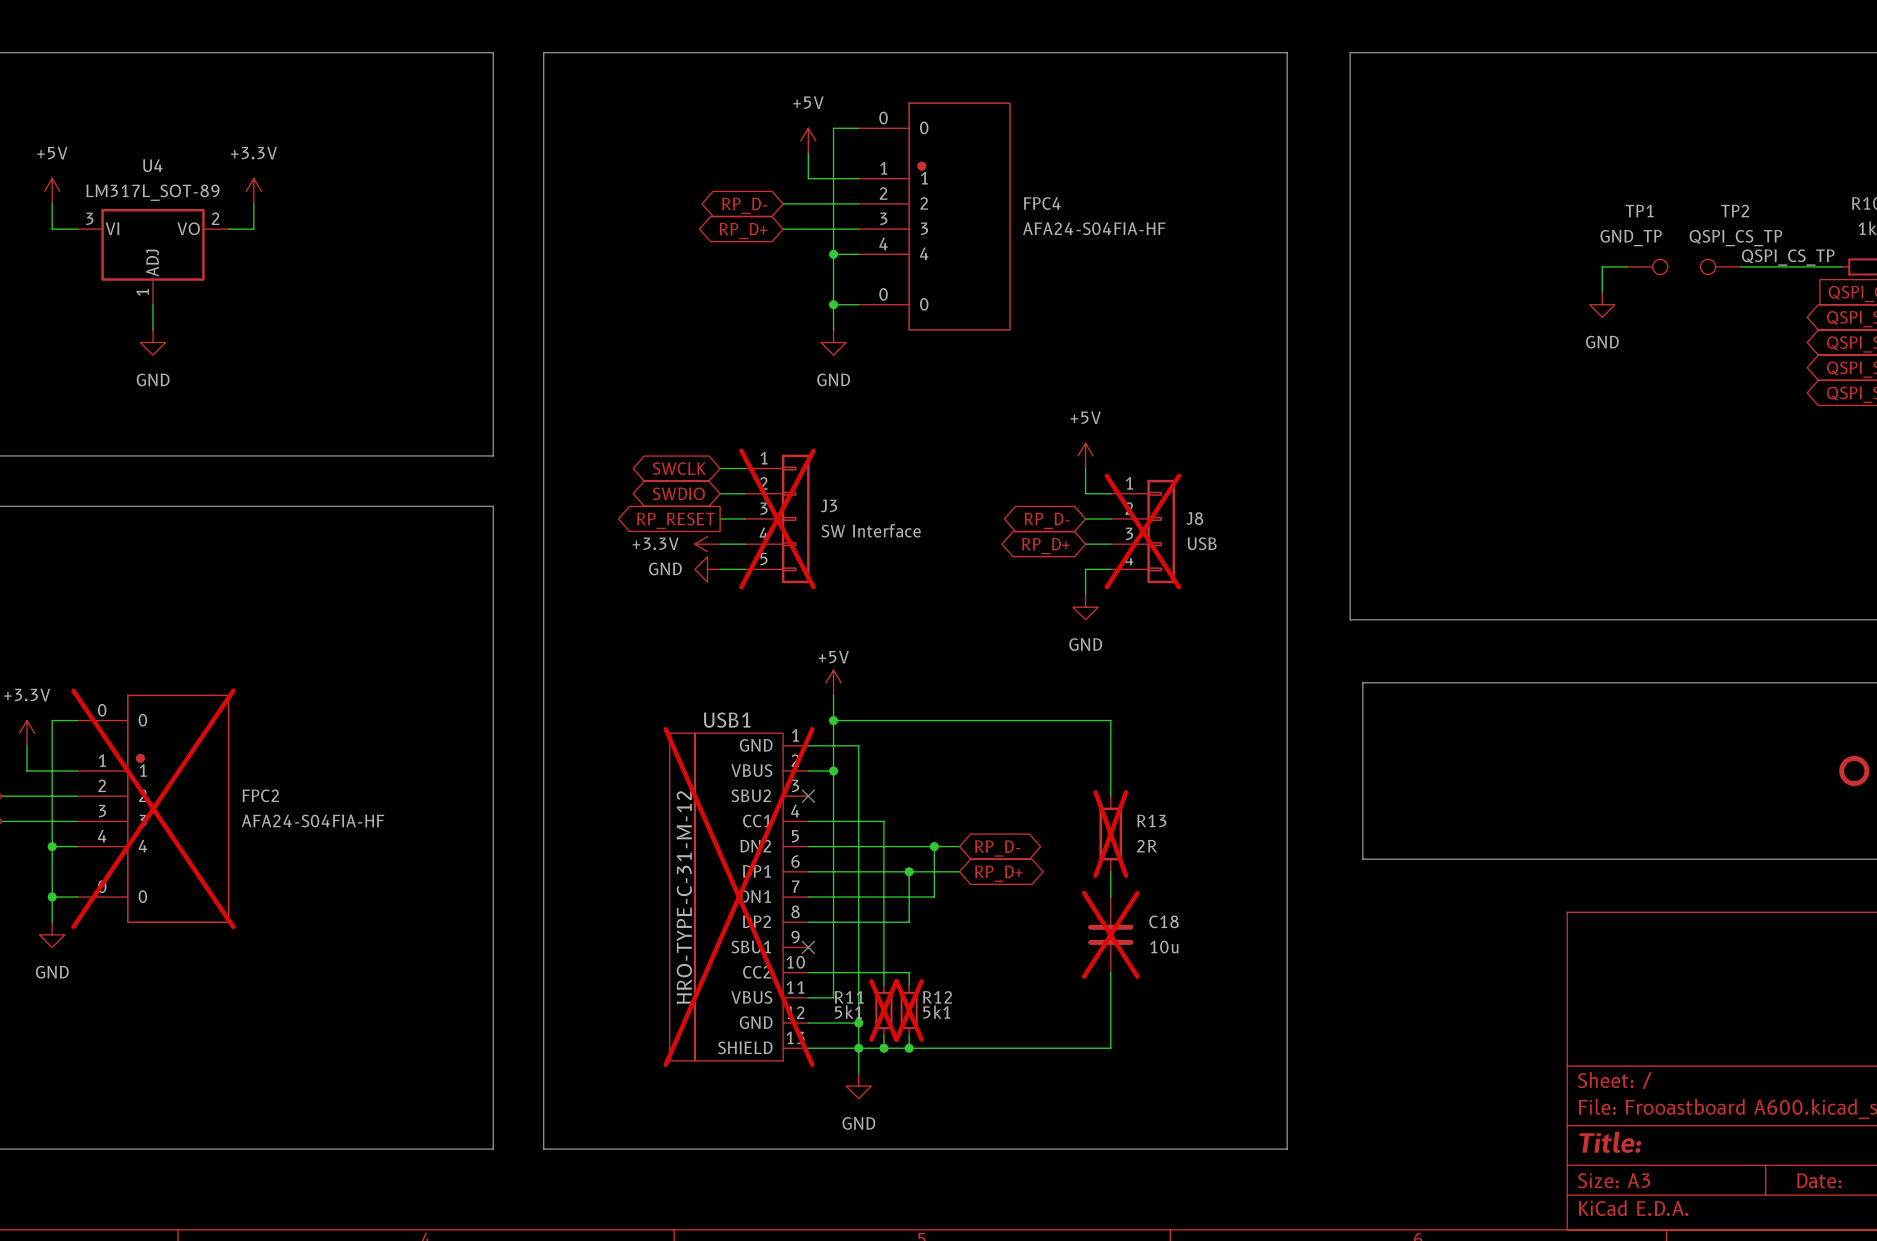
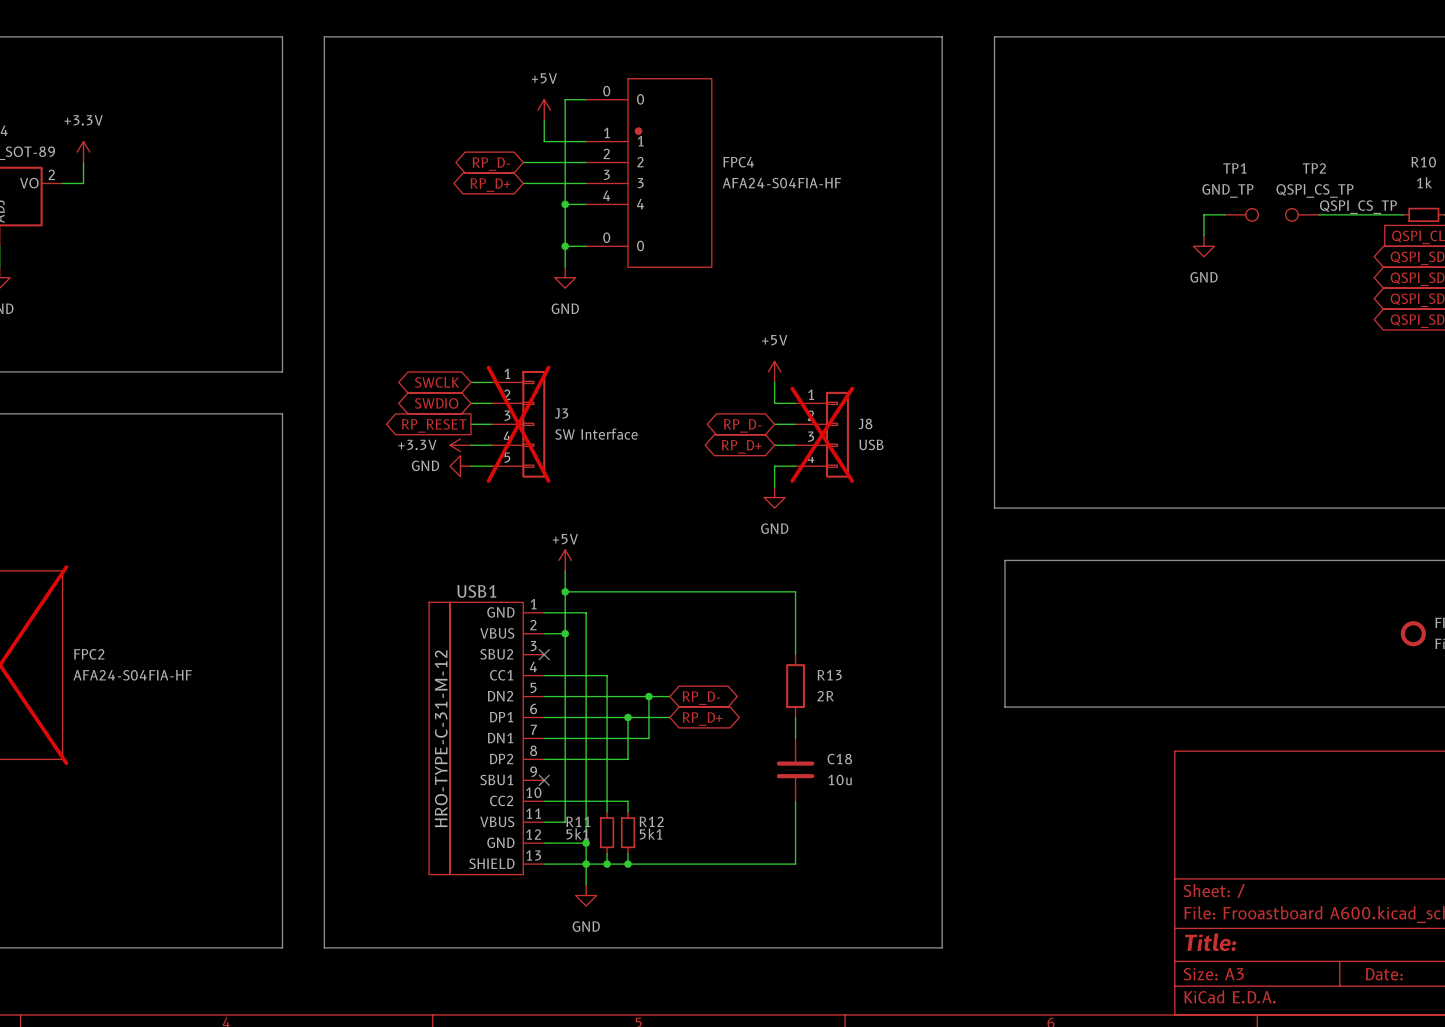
R13 do-not-place cross: (1110, 834) -> none
USB1 do-not-place cross: (739, 897) -> none
C18 do-not-place cross: (1110, 934) -> none
R11 do-not-place cross: (883, 1010) -> none
R12 do-not-place cross: (909, 1010) -> none

